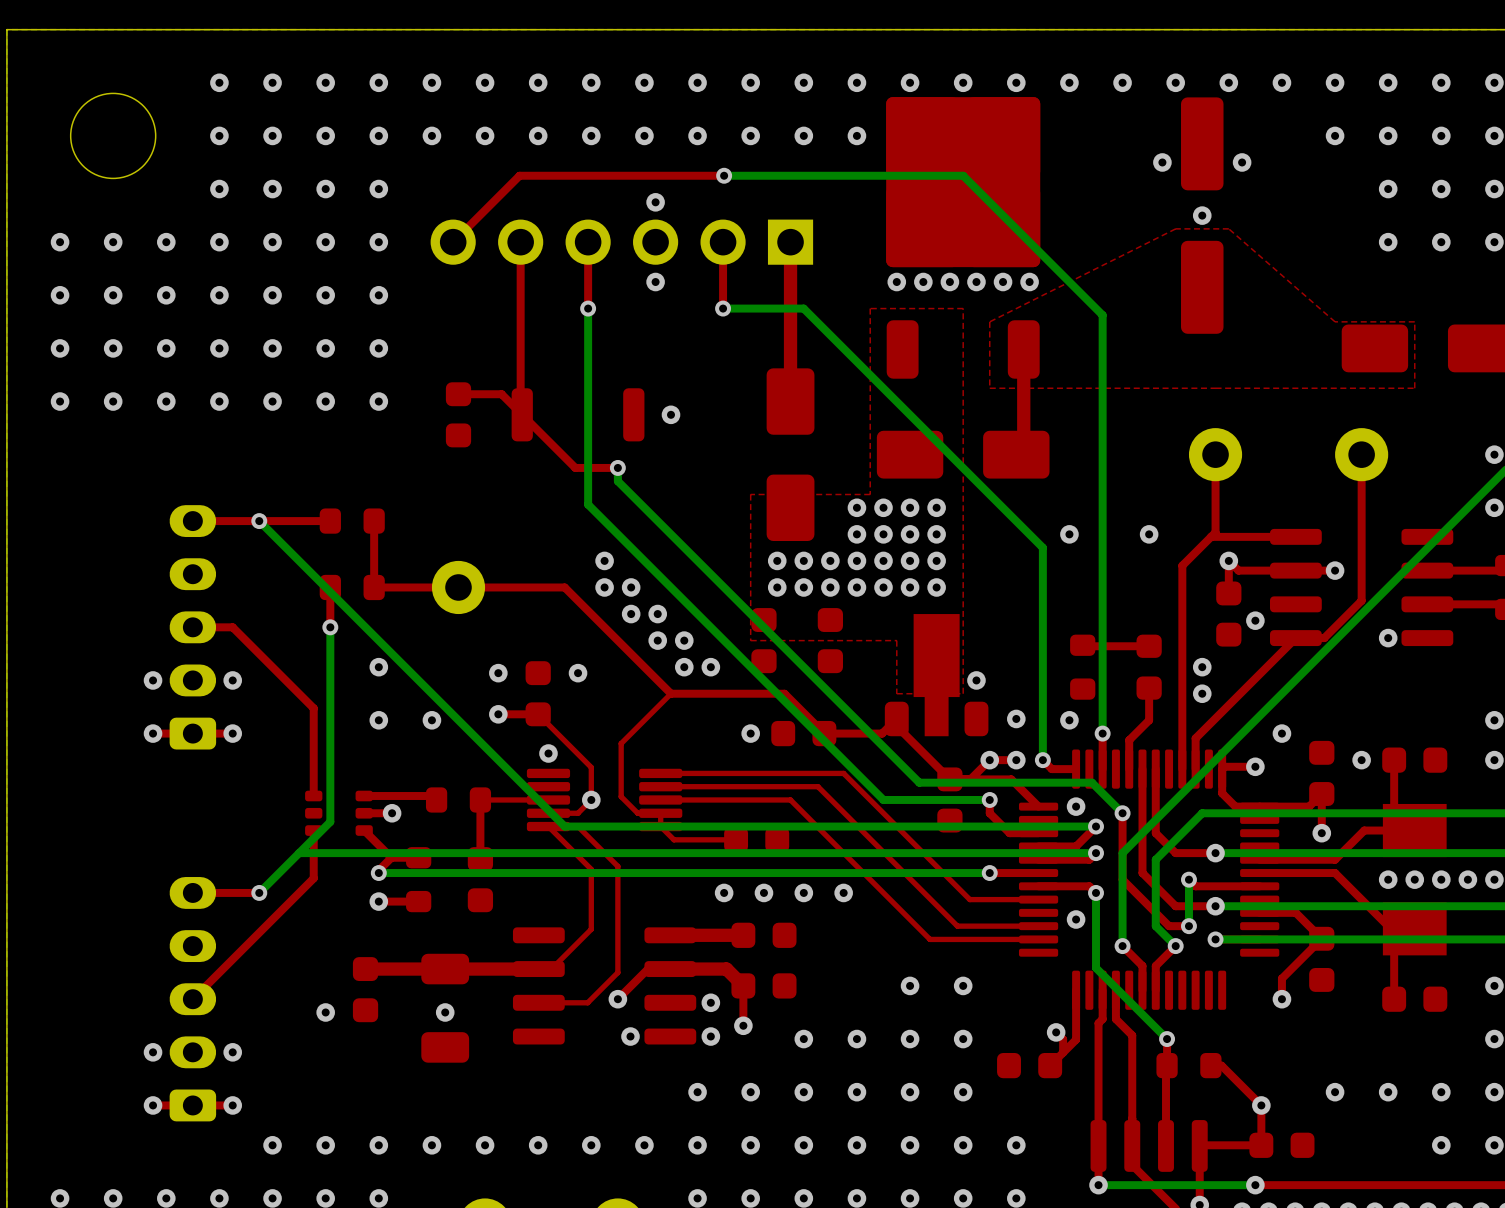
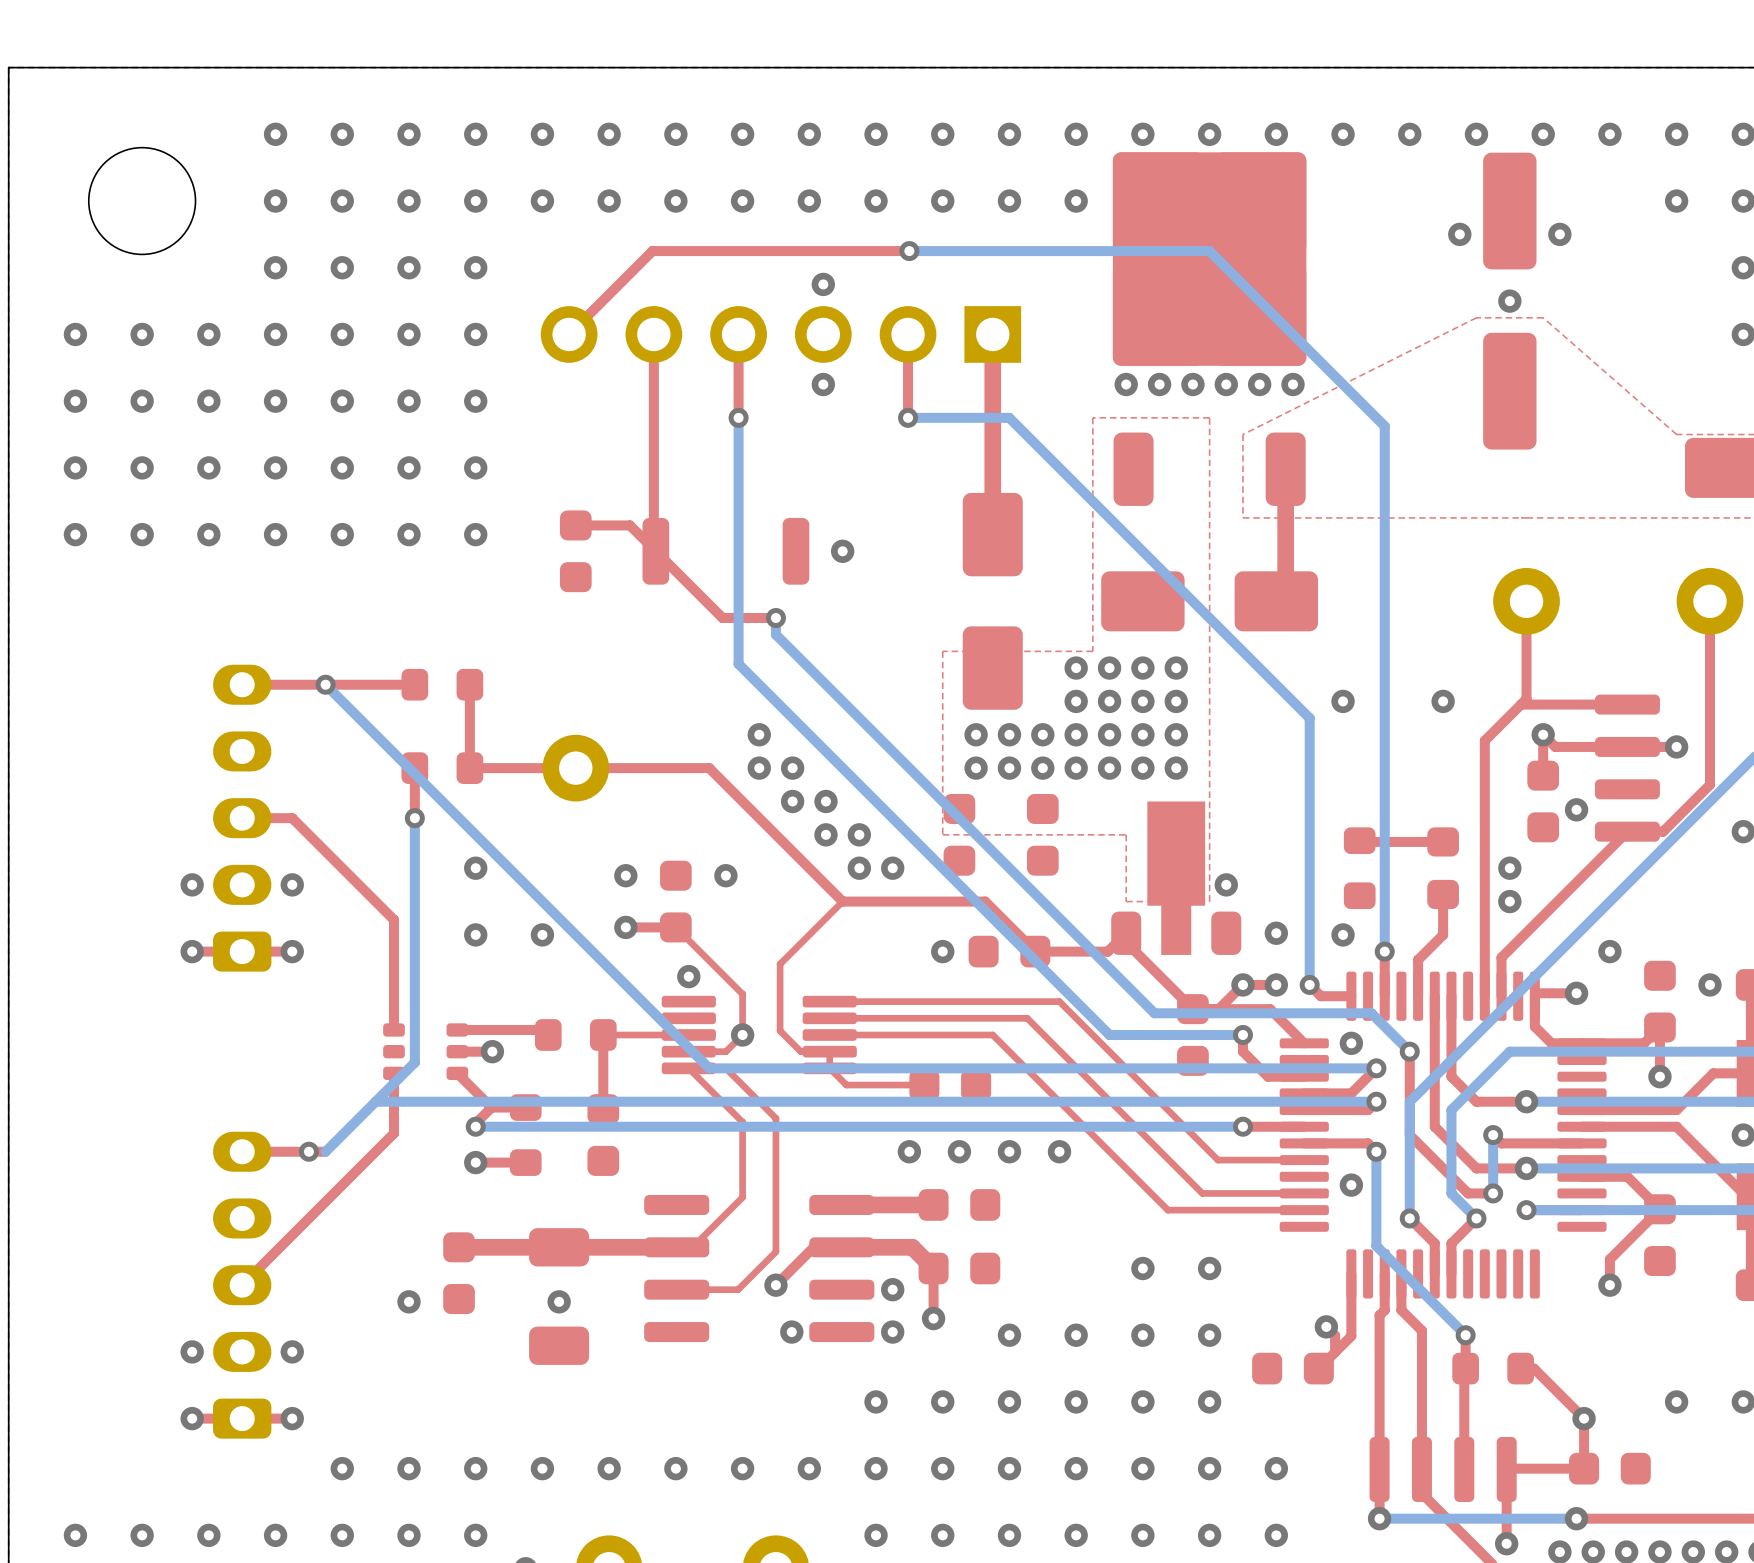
via position: (259, 892) -> (308, 1151)

